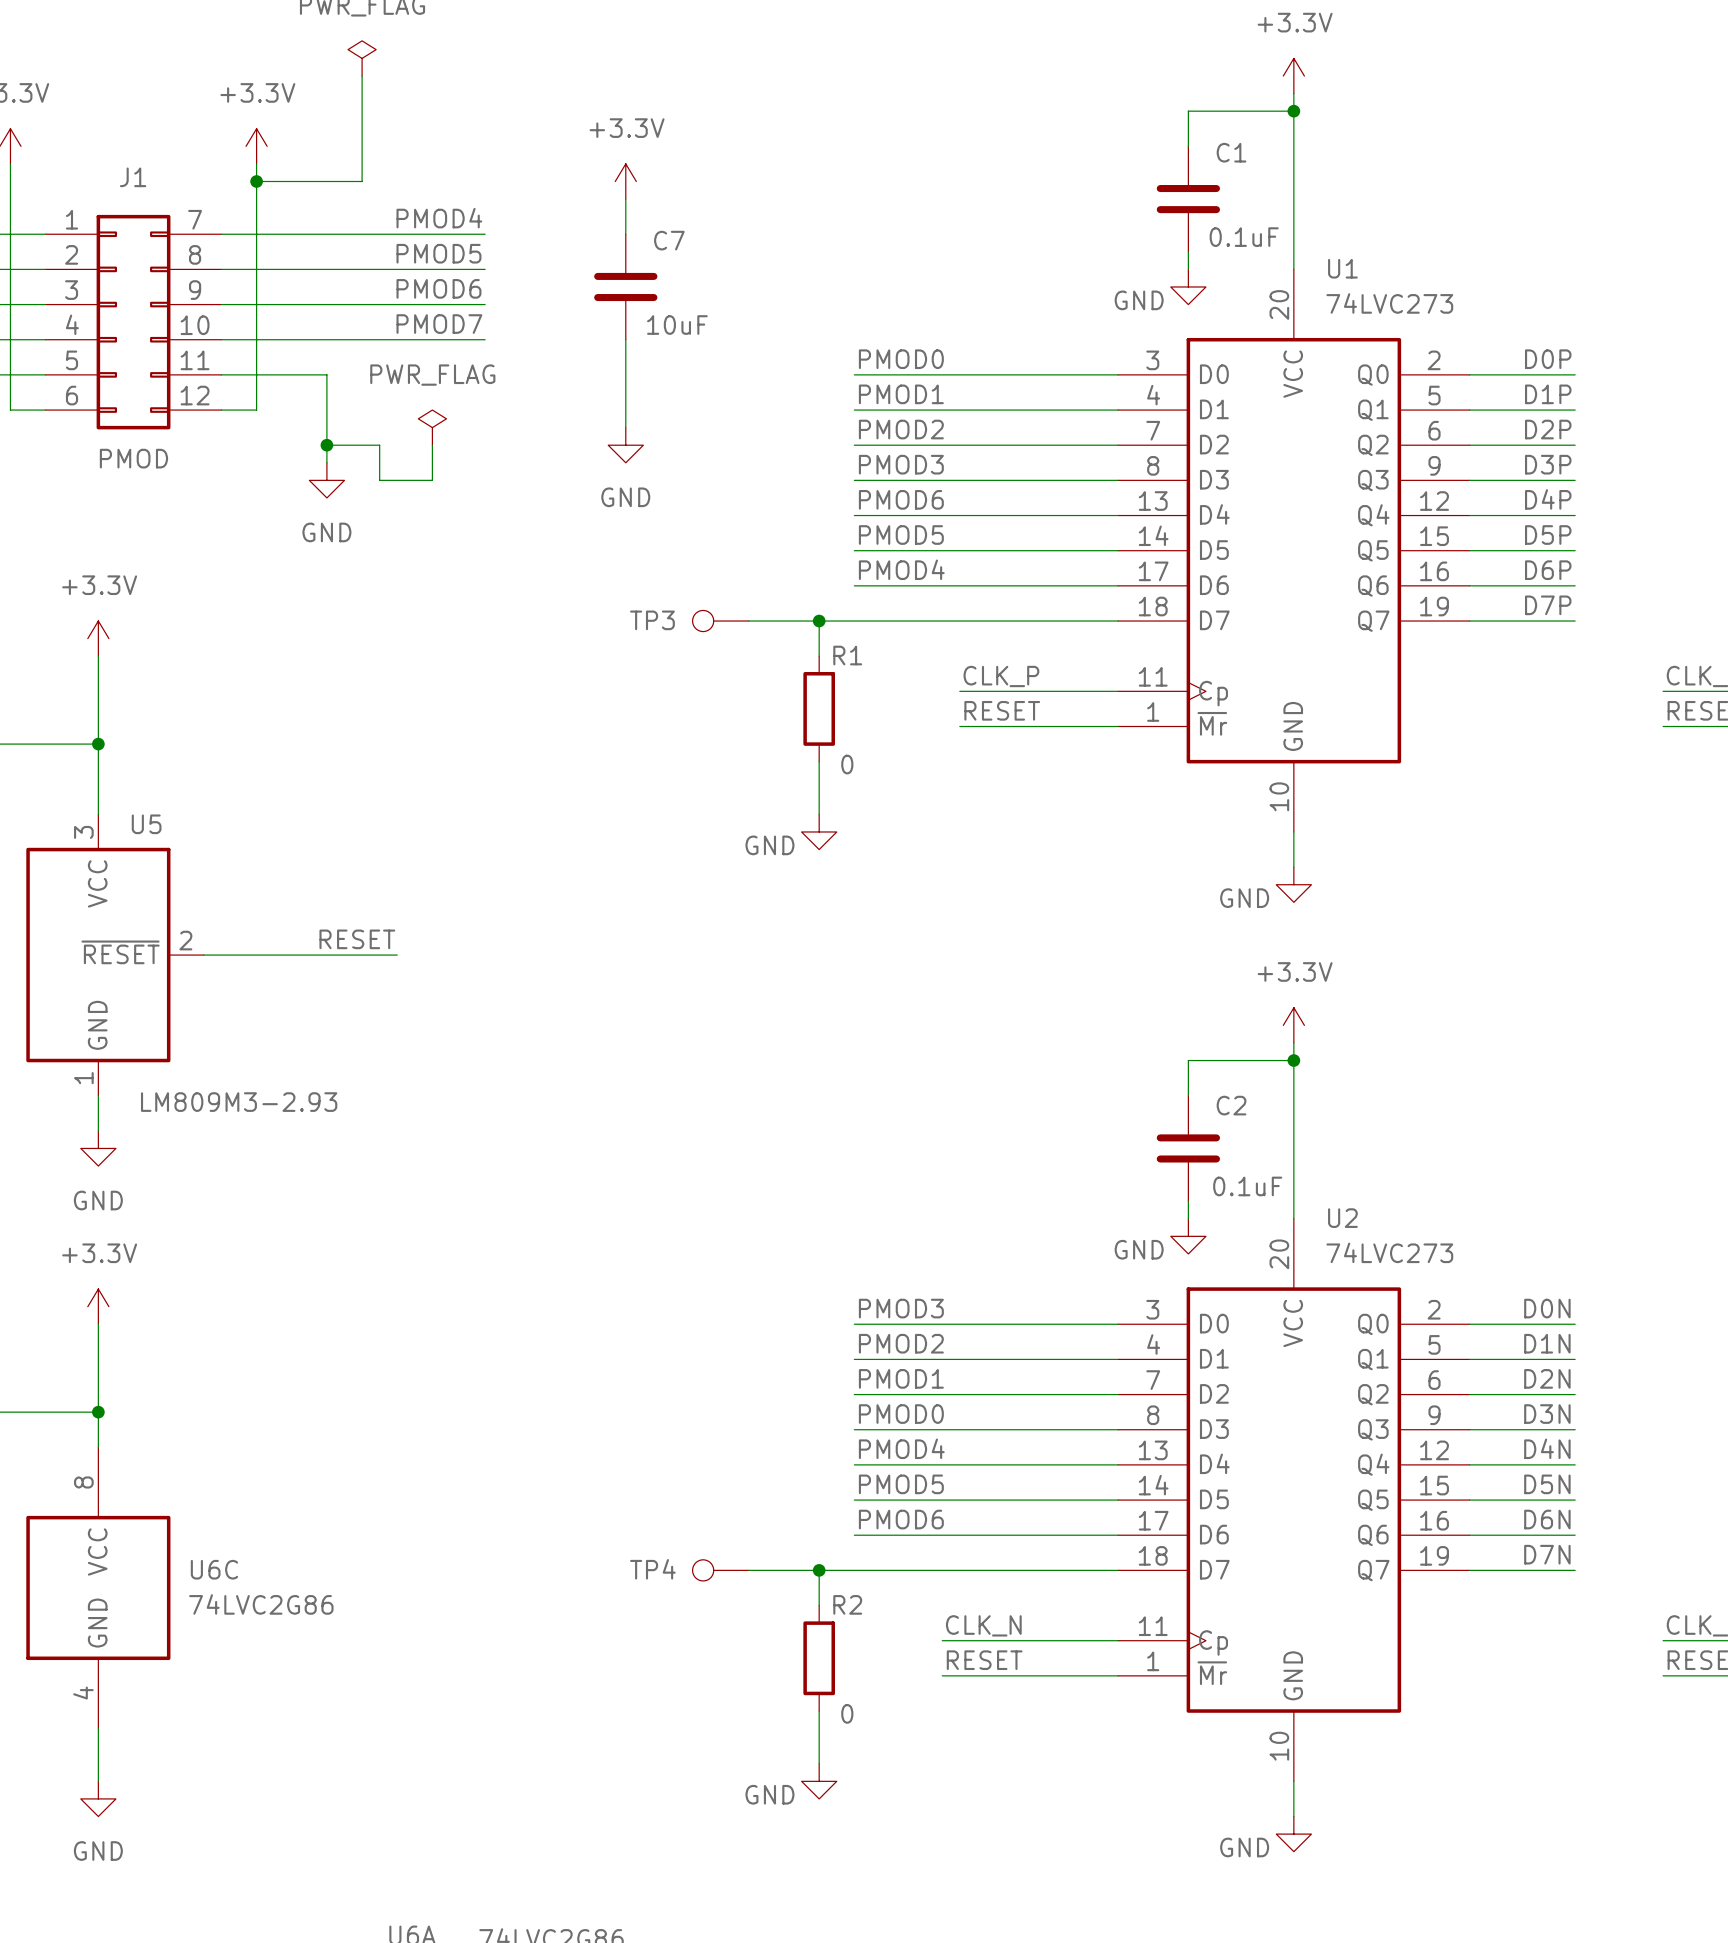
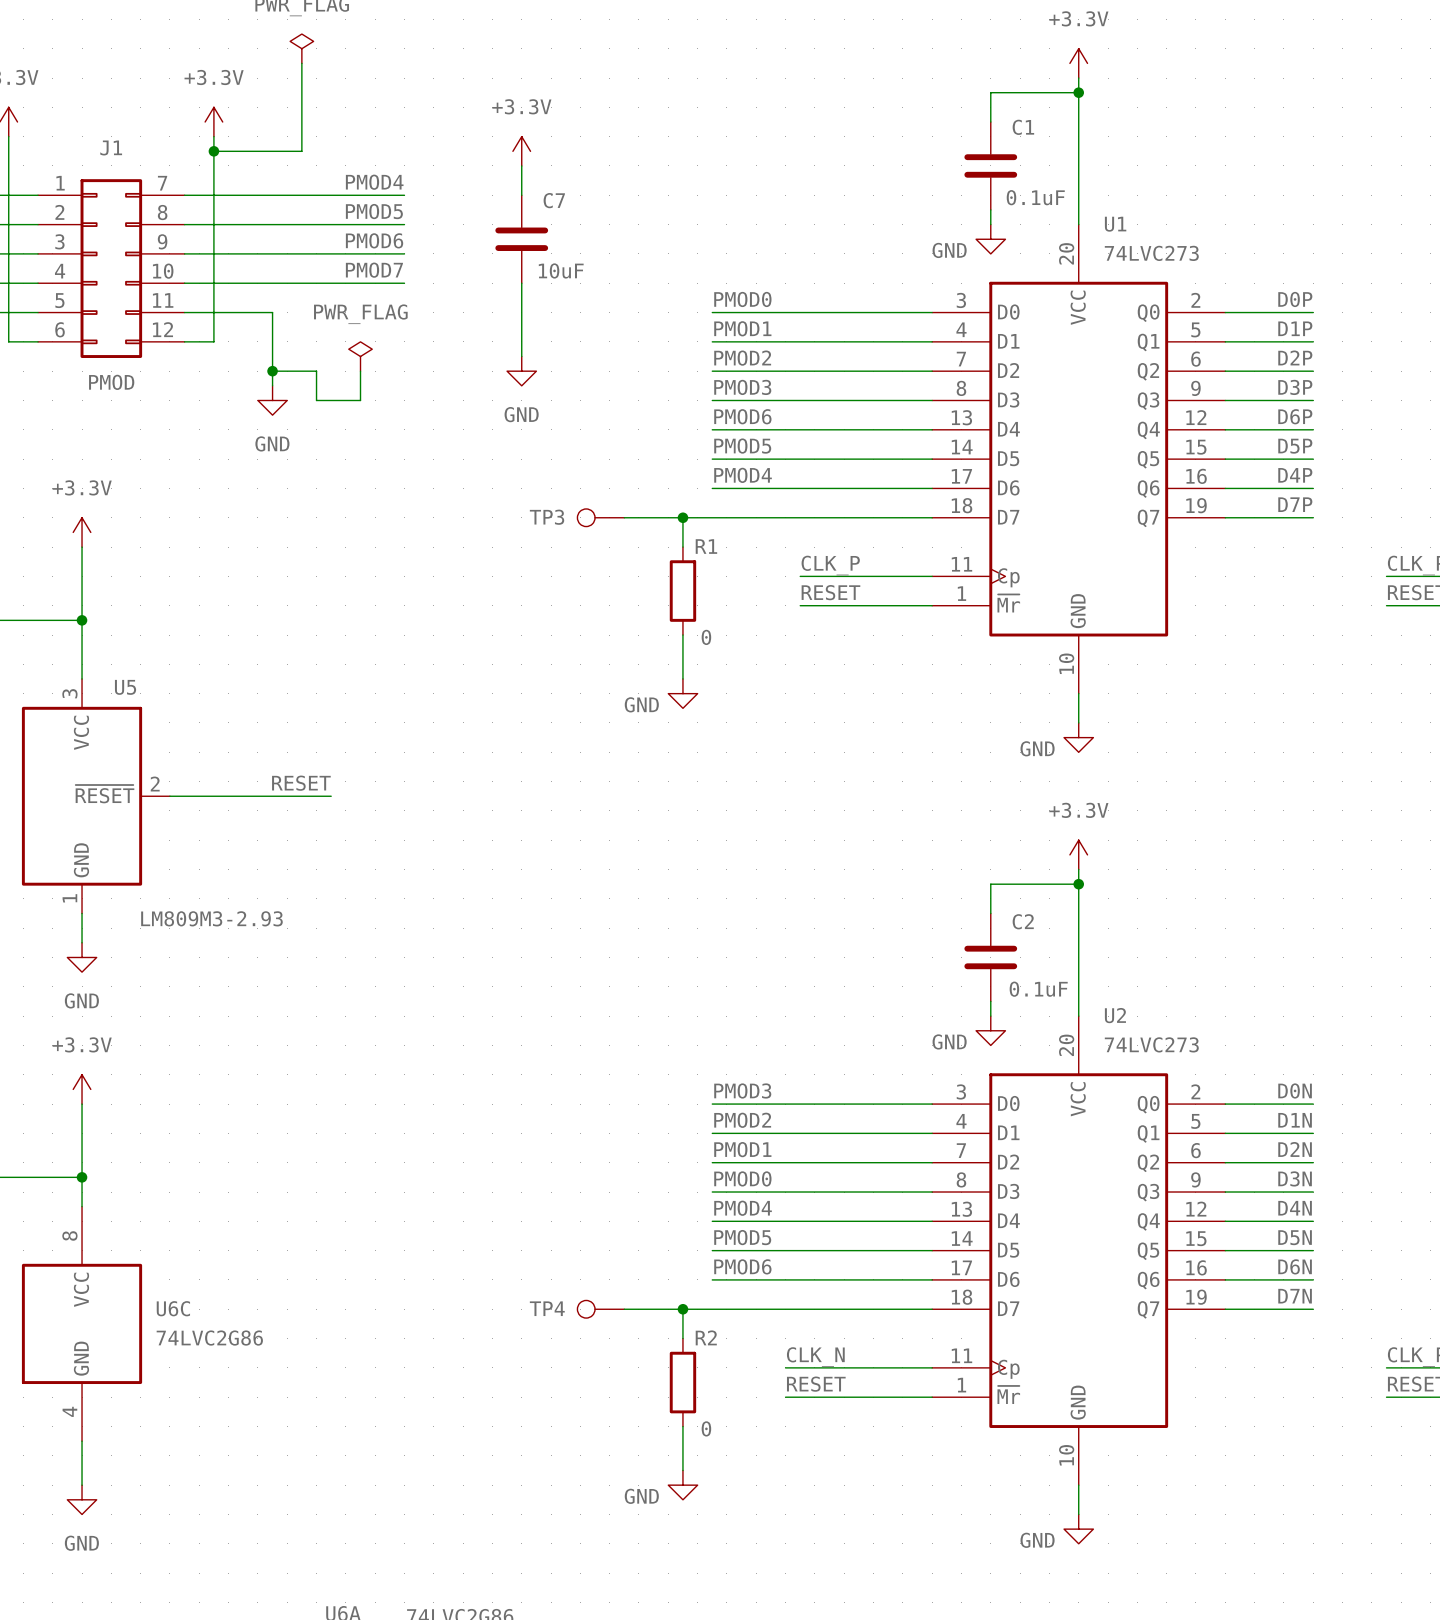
label: D4P (1548, 499) -> D6P (1295, 416)
label: D6P (1548, 570) -> D4P (1295, 475)

